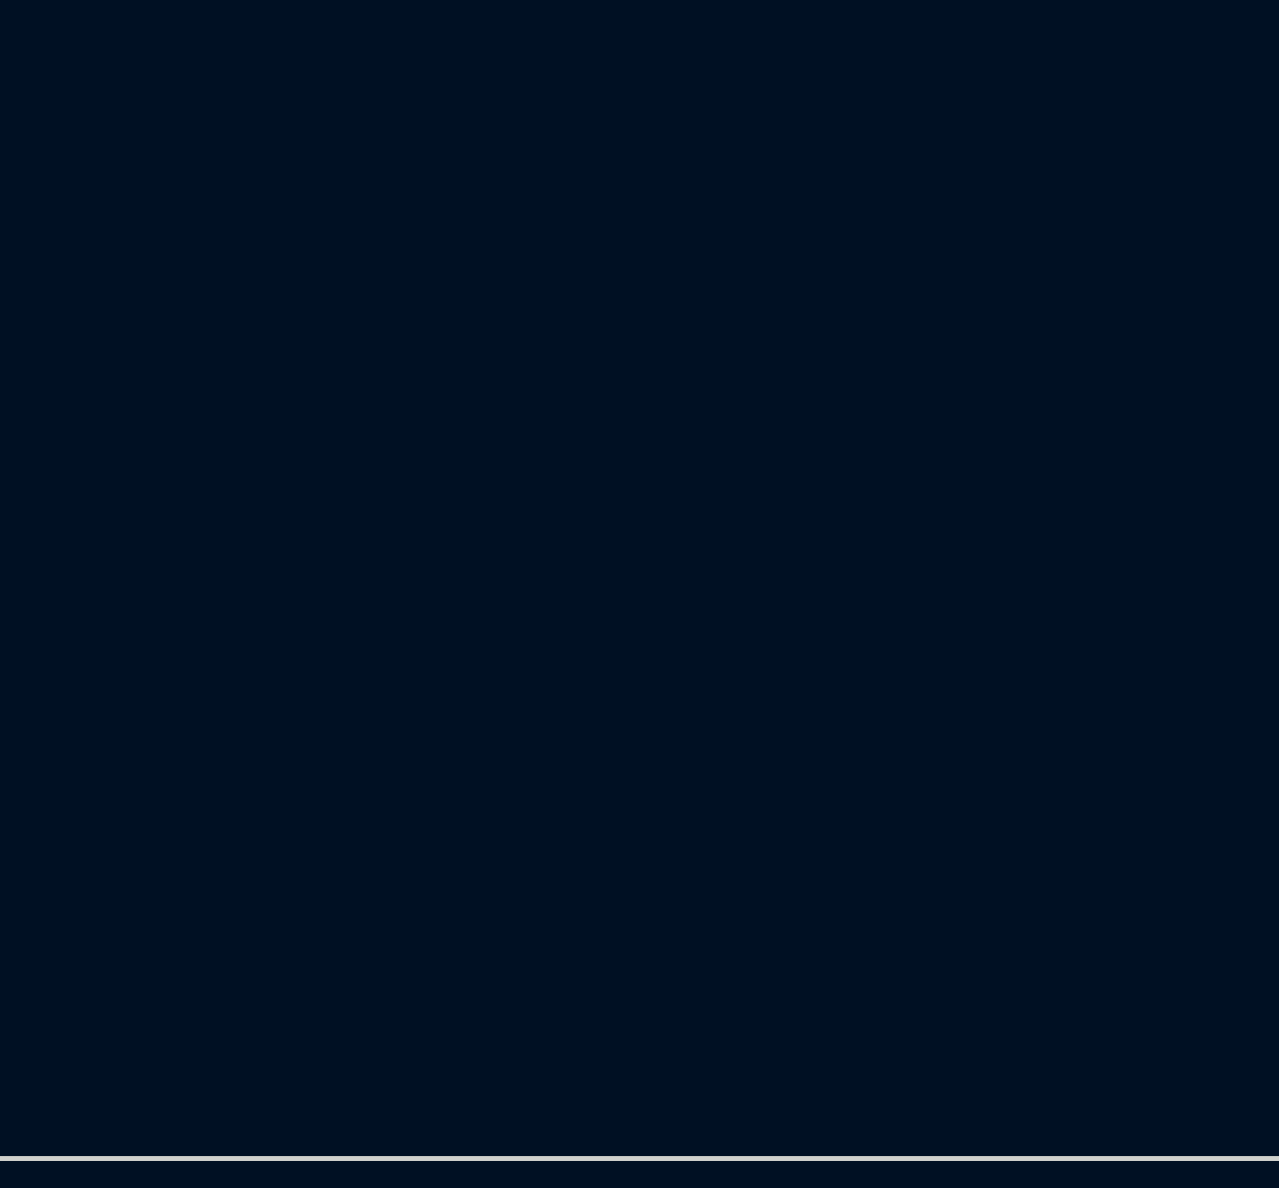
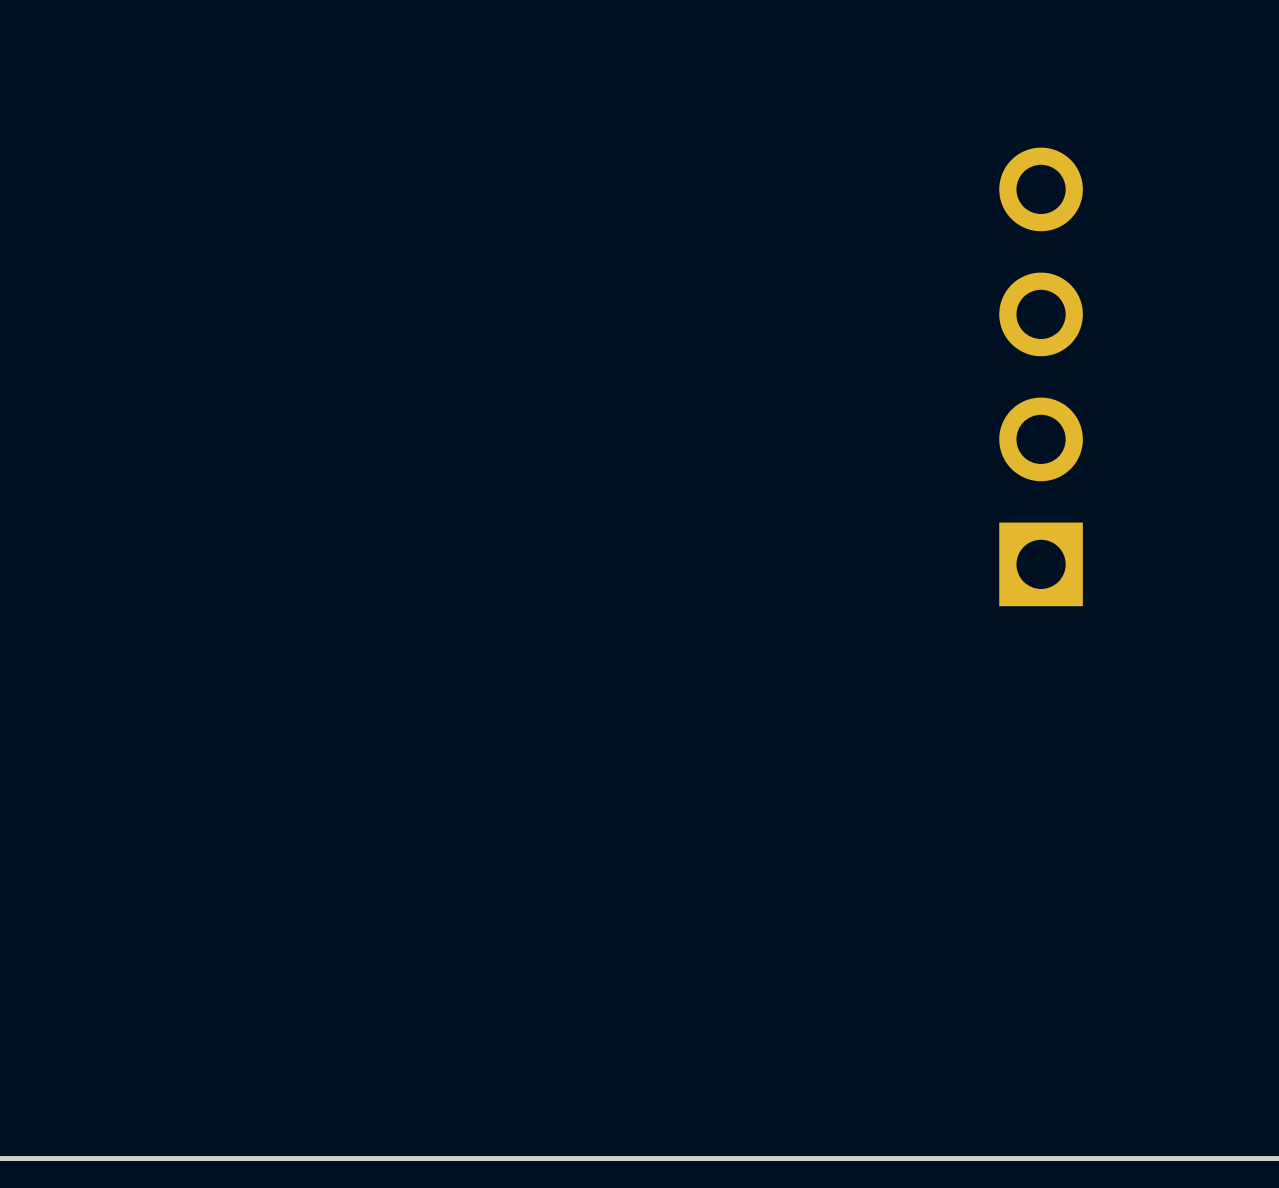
part: none -> (1041, 376)

